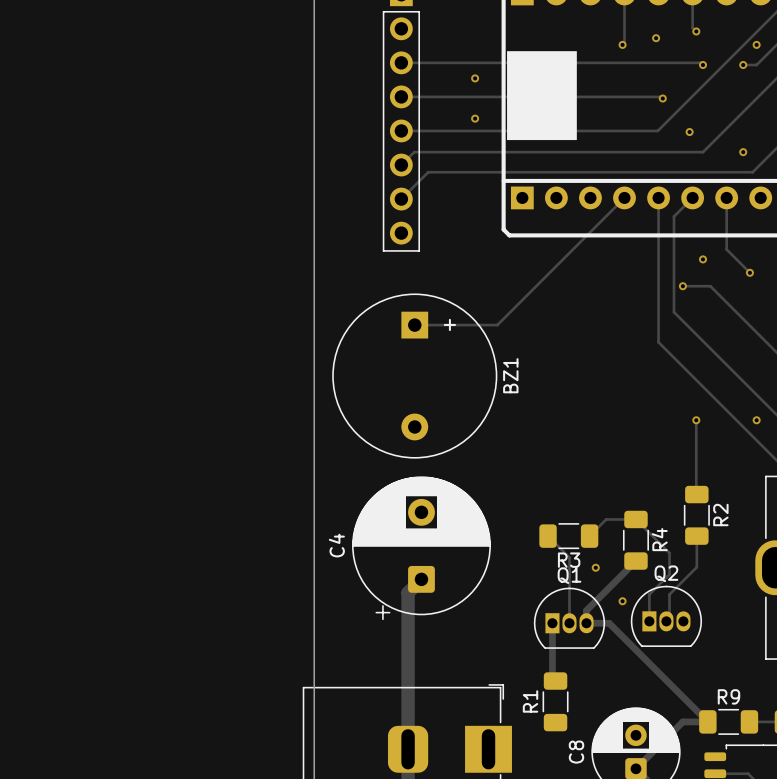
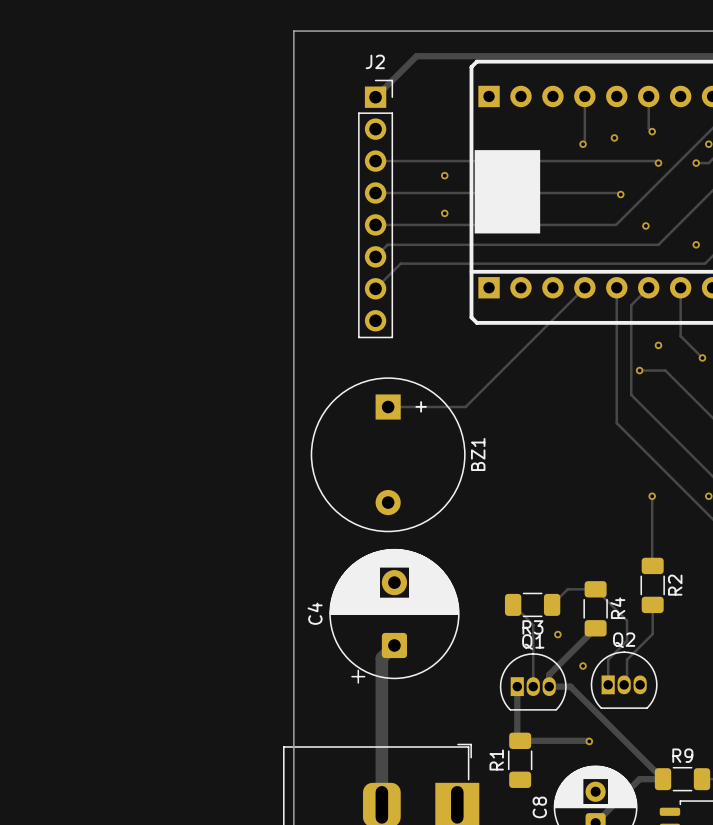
track: none -> (520, 740) (589, 741)
via: none -> (589, 741)

